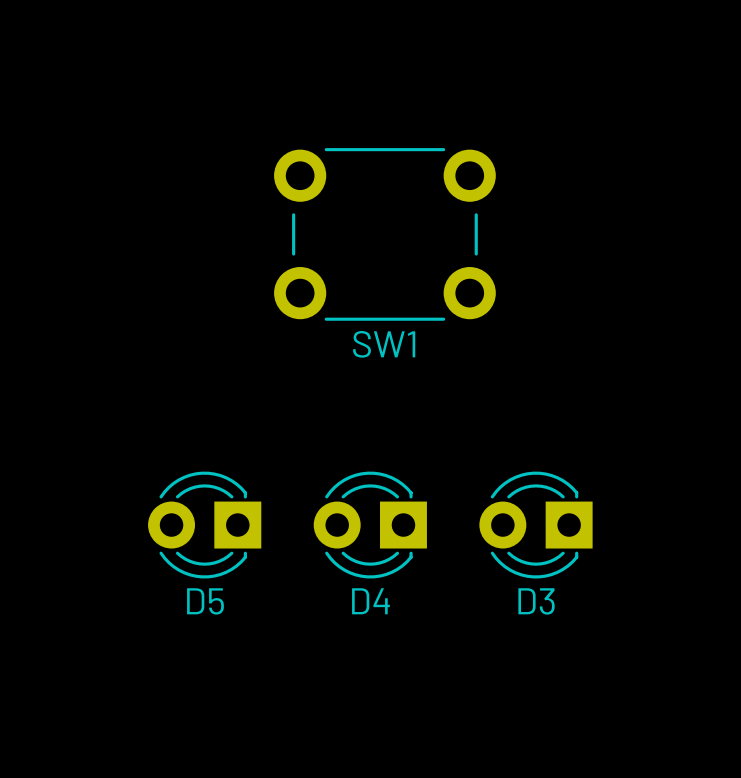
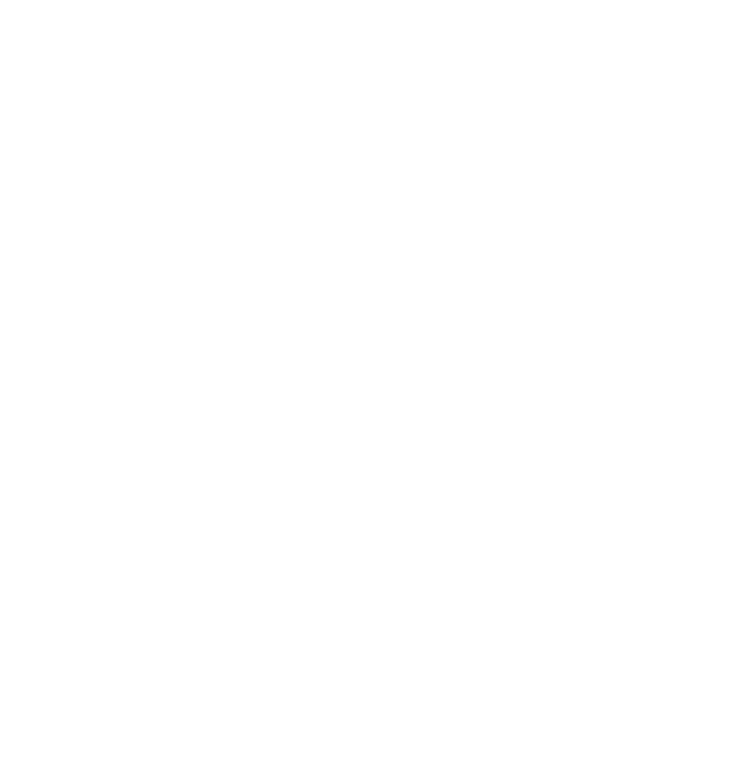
SW1: (384, 234) -> none
D5: (204, 525) -> none
D4: (370, 525) -> none
D3: (536, 525) -> none

